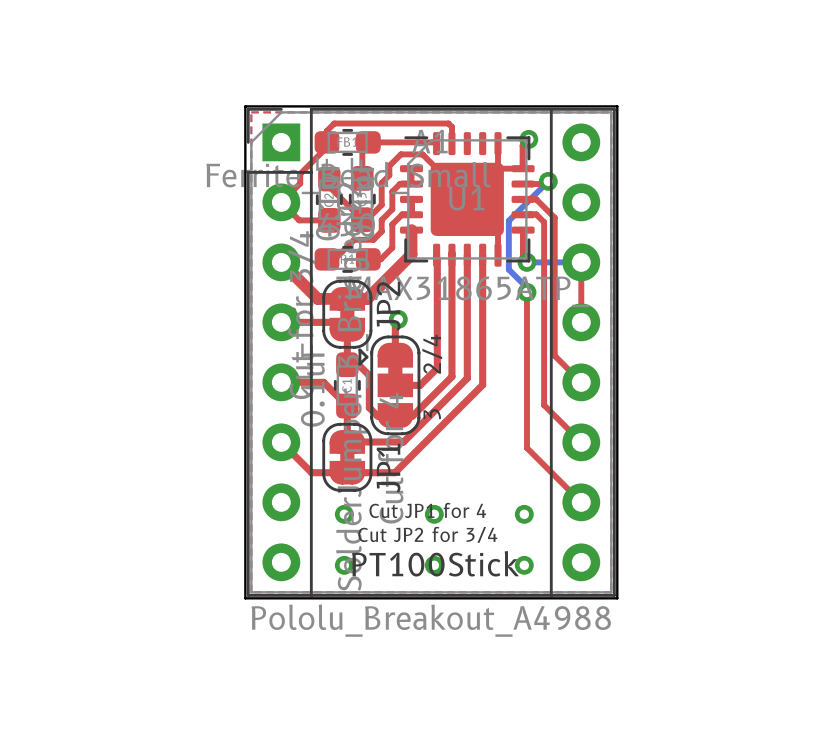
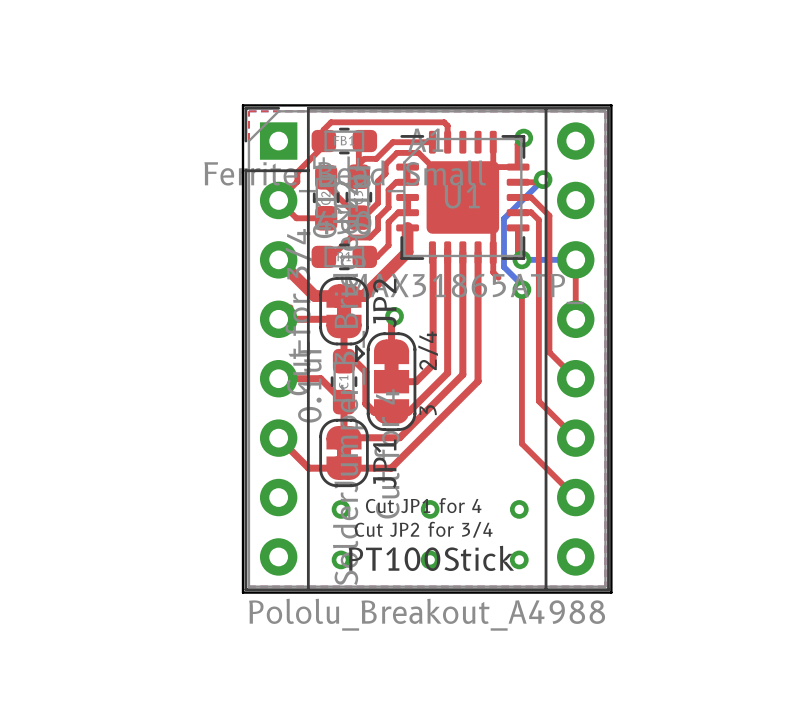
top track: (368, 142) (434, 142) -> none
top track: none -> (432, 142) (392, 142) (376, 158) (364, 158) (358, 164)
top track: none -> (493, 252) (493, 272) (498, 277)

